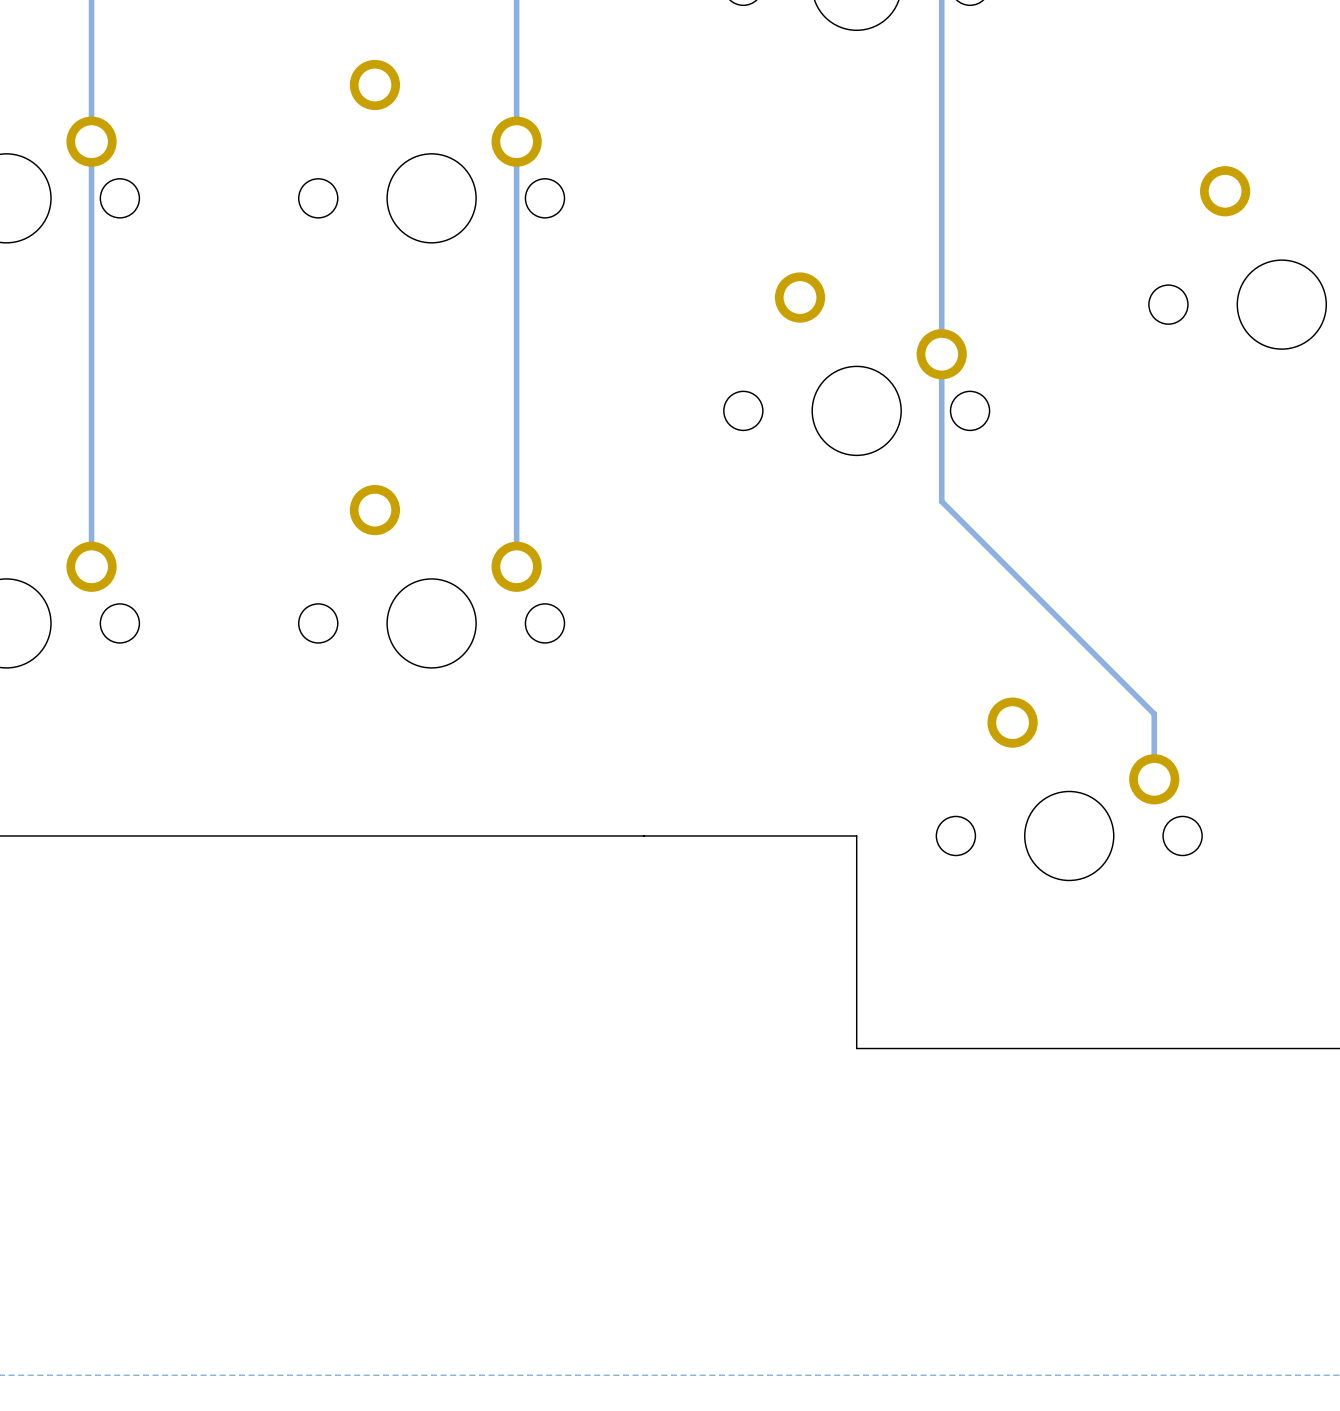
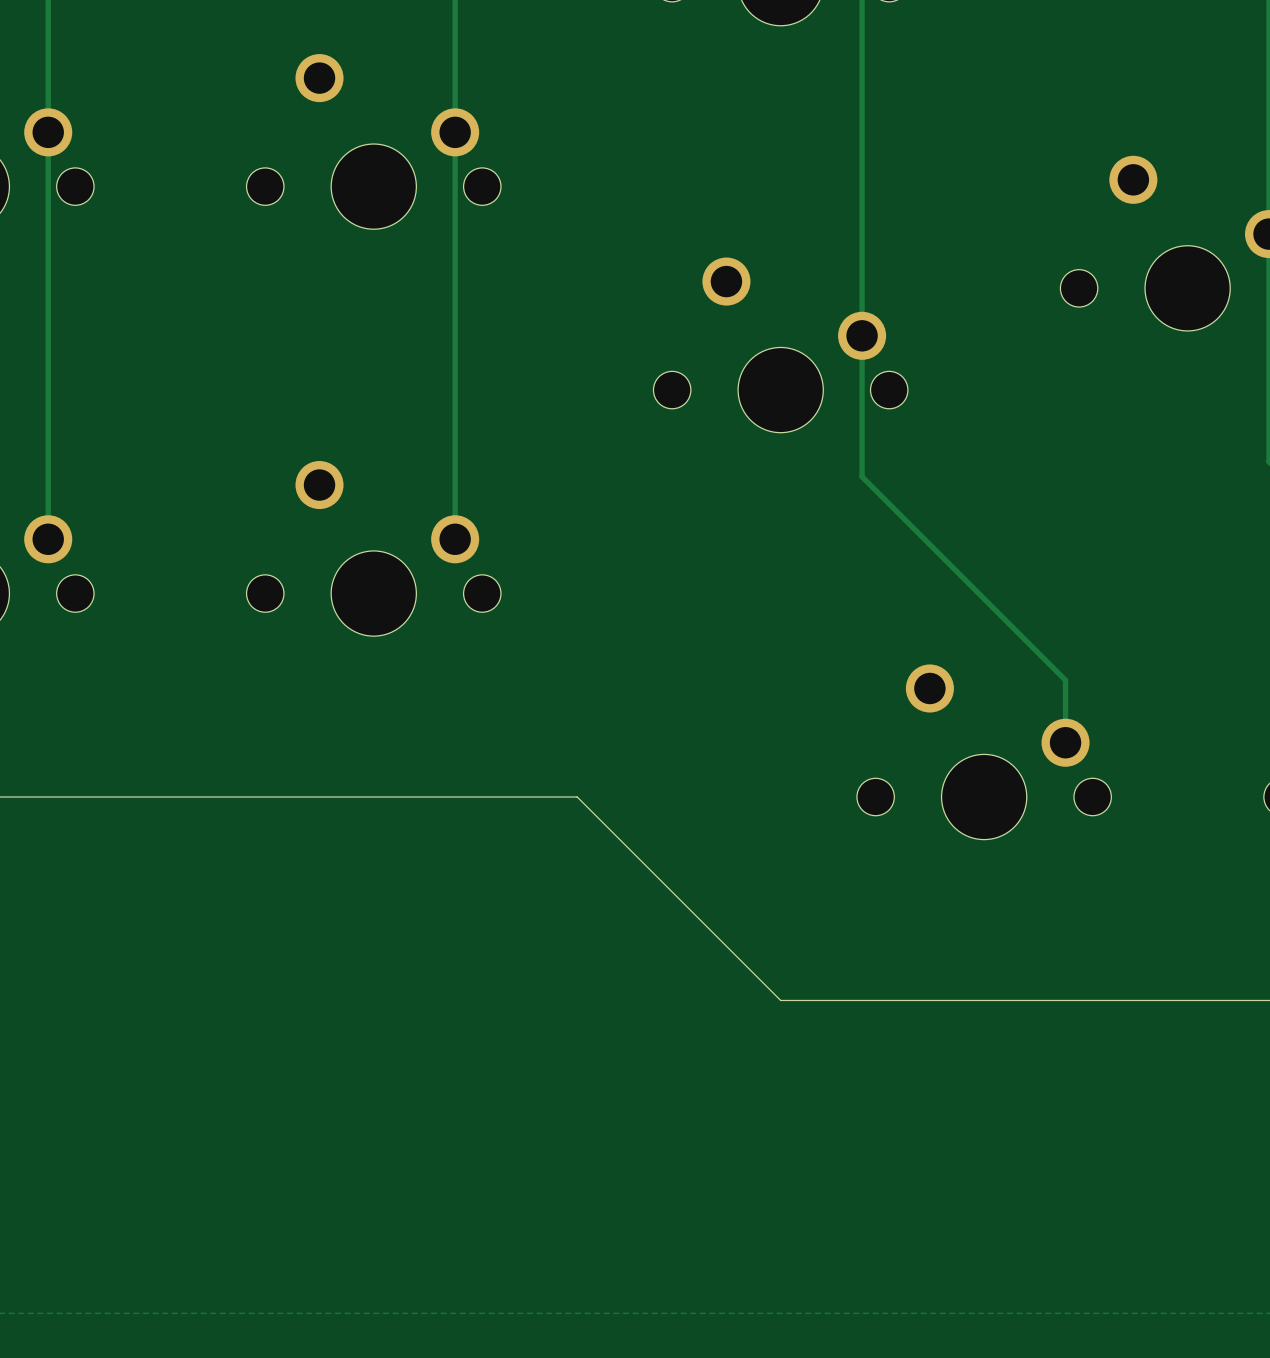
board edge: (644, 835) (856, 835) (856, 1048) -> (577, 797) (780, 1000)

